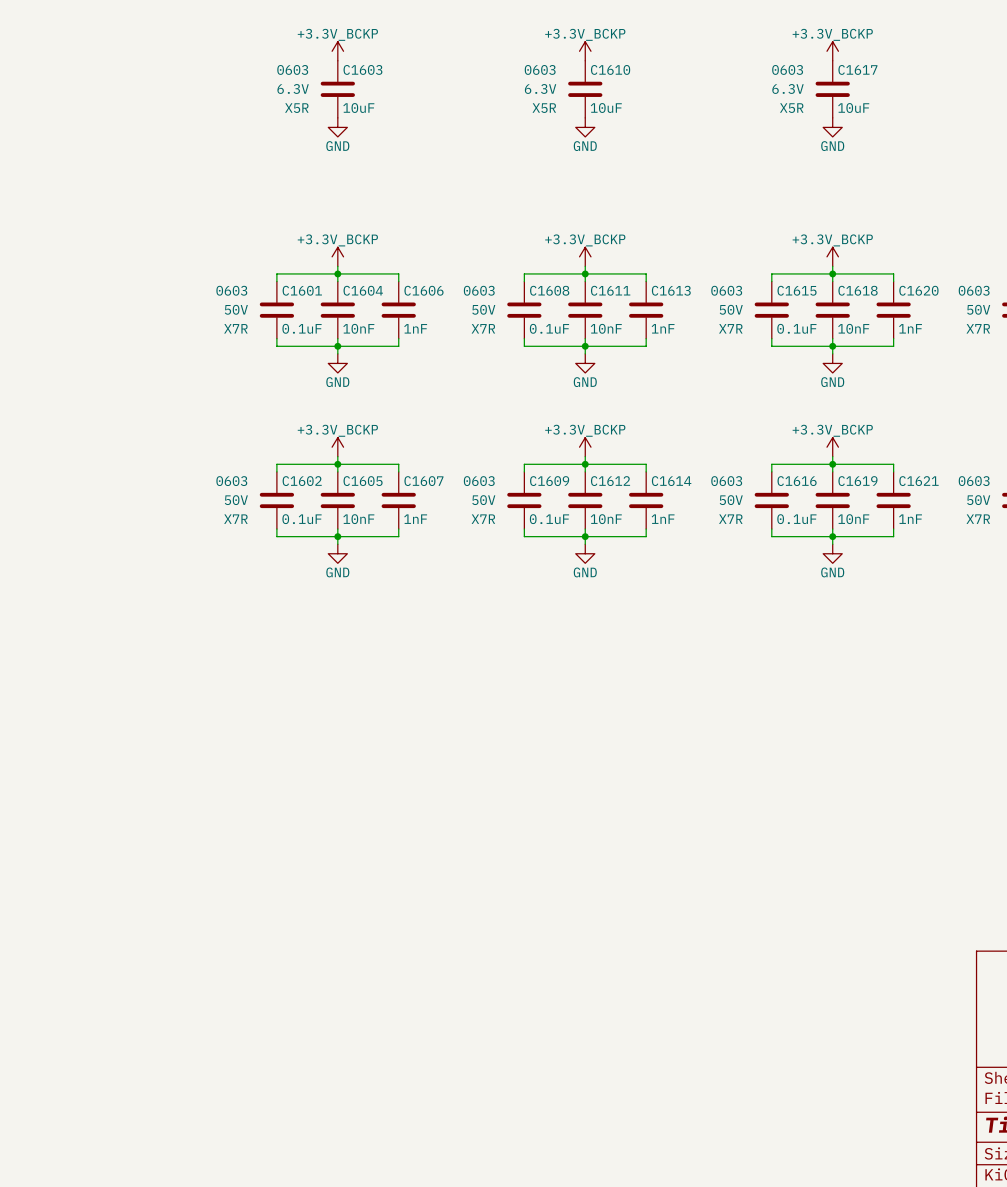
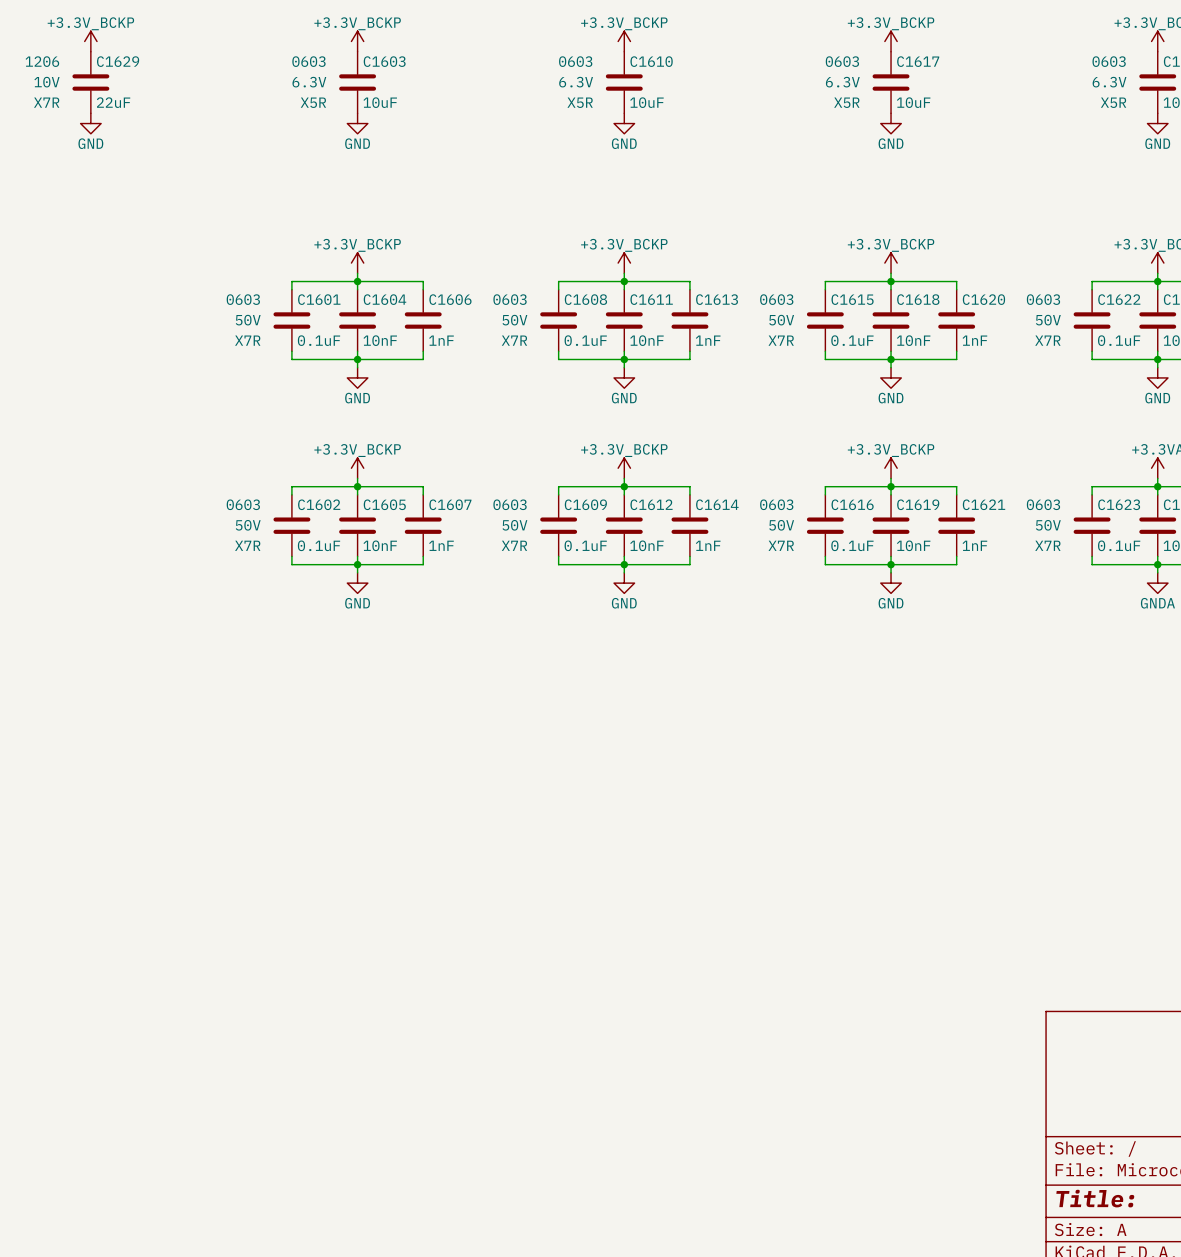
power symbol: none -> +3.3V_BCKP (90, 41)
C1629: none -> 22uF (90, 82)
power symbol: none -> GND (90, 123)

